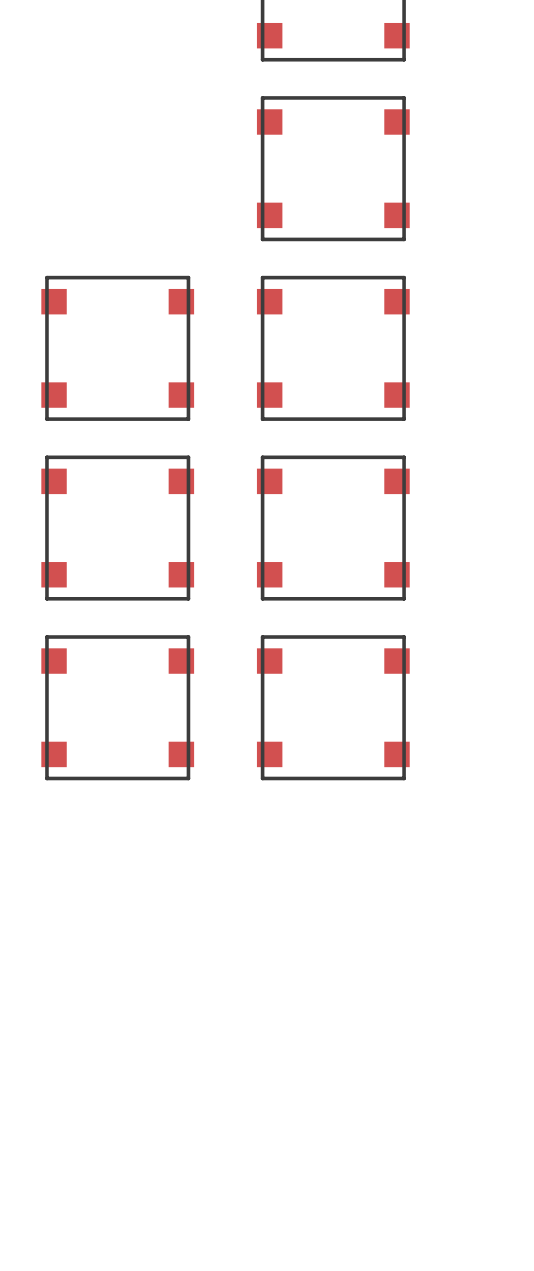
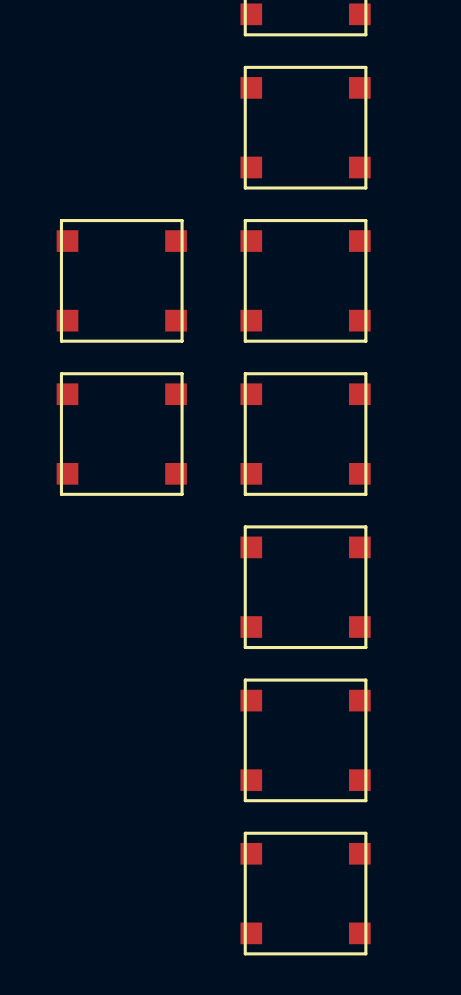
part: (117, 707) -> none
part: none -> (305, 740)
part: none -> (305, 893)

